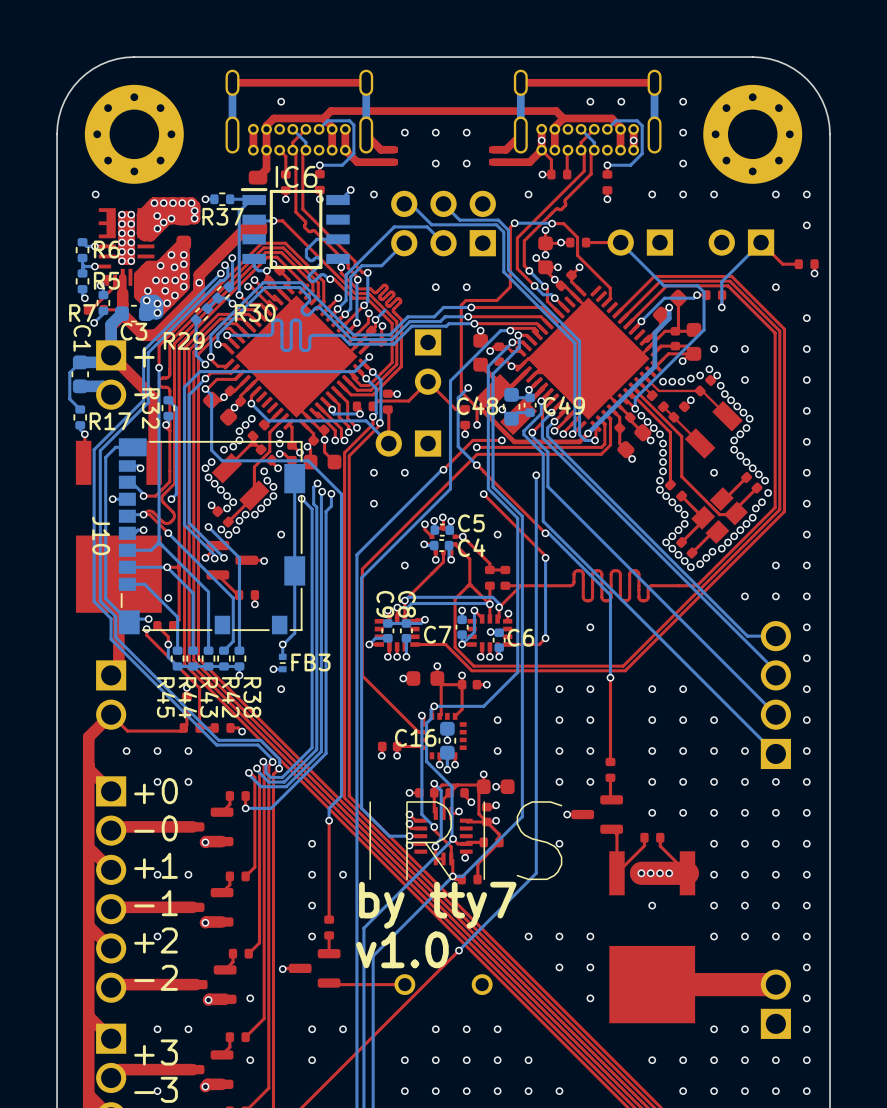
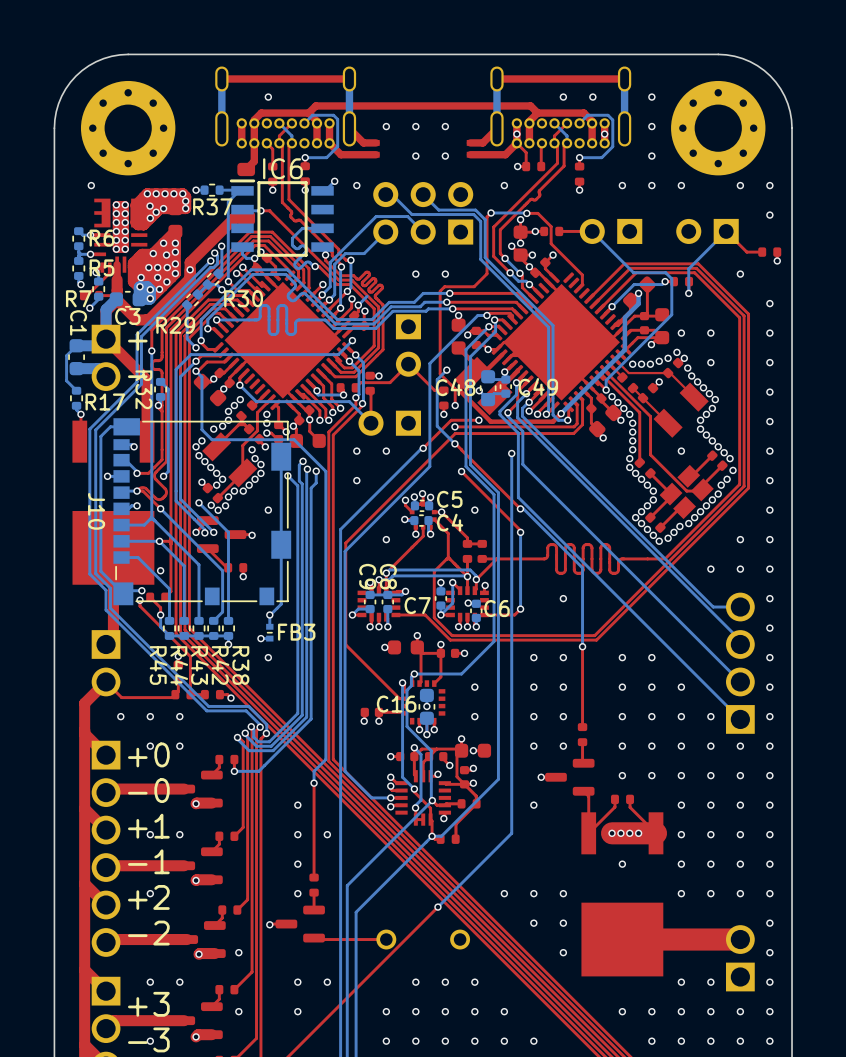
text: IRIS (465, 840) -> none
text: by tty7 (437, 905) -> none
text: v1.0 (402, 949) -> none

